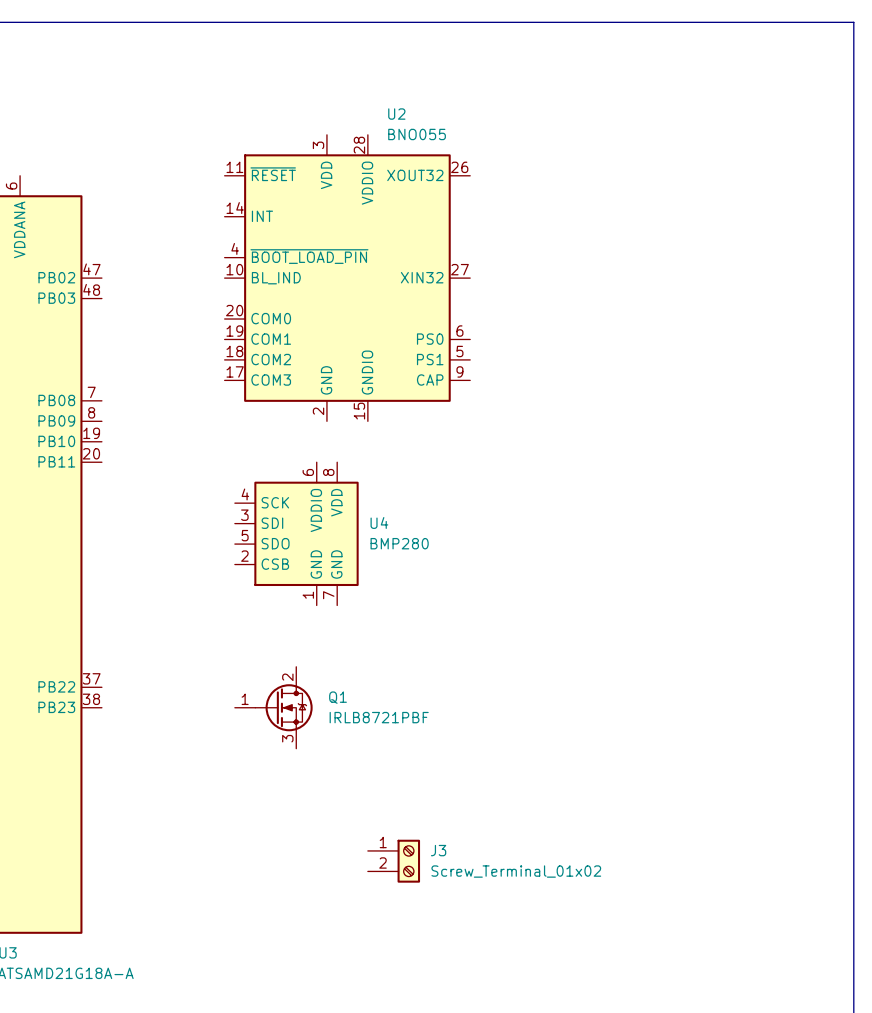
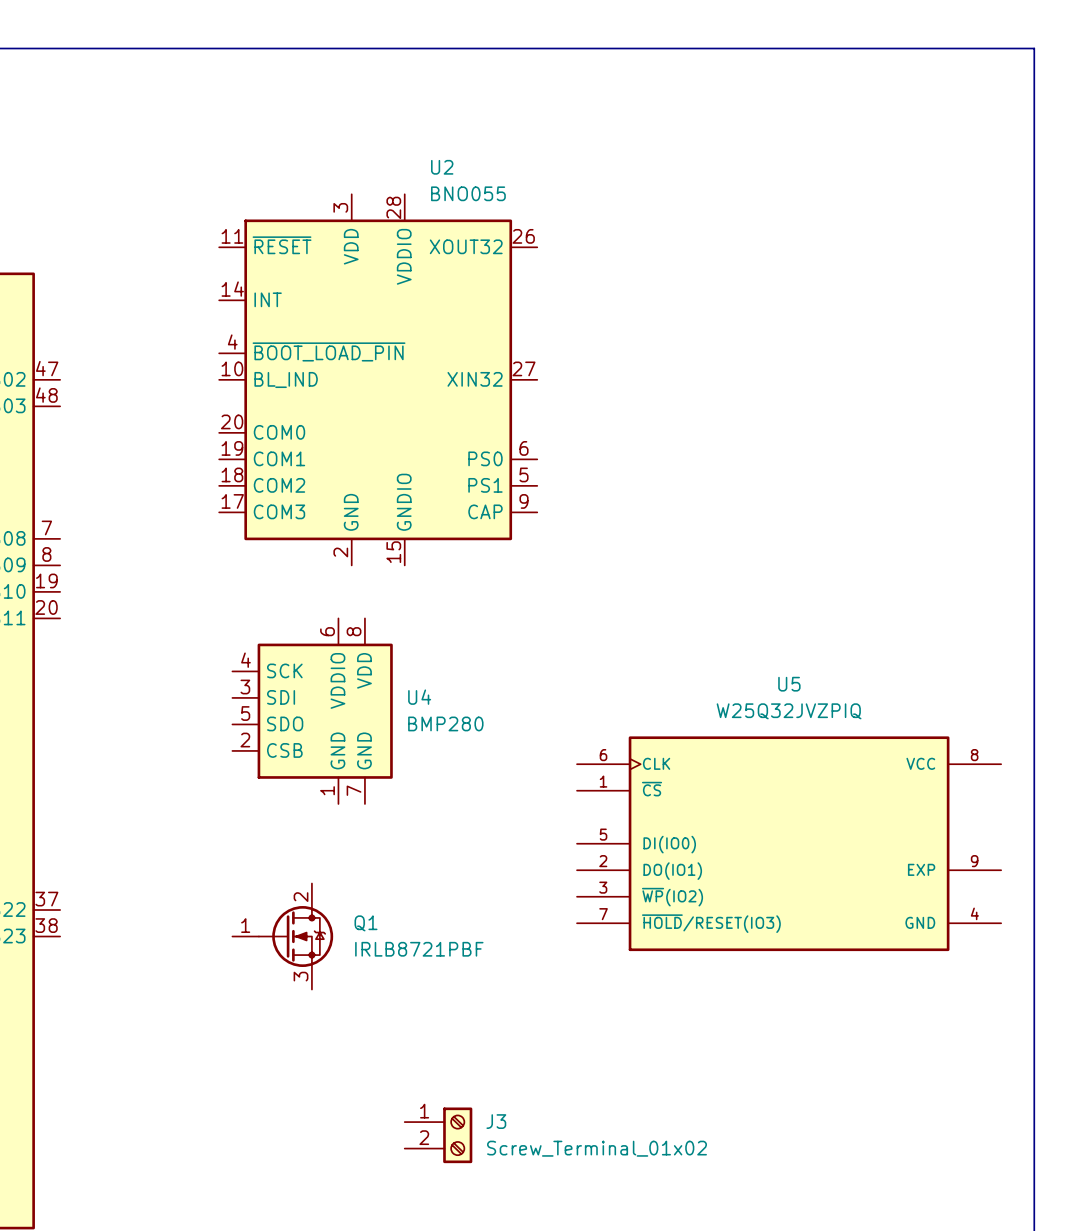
U5: none -> W25Q32JVZPIQ (789, 843)

